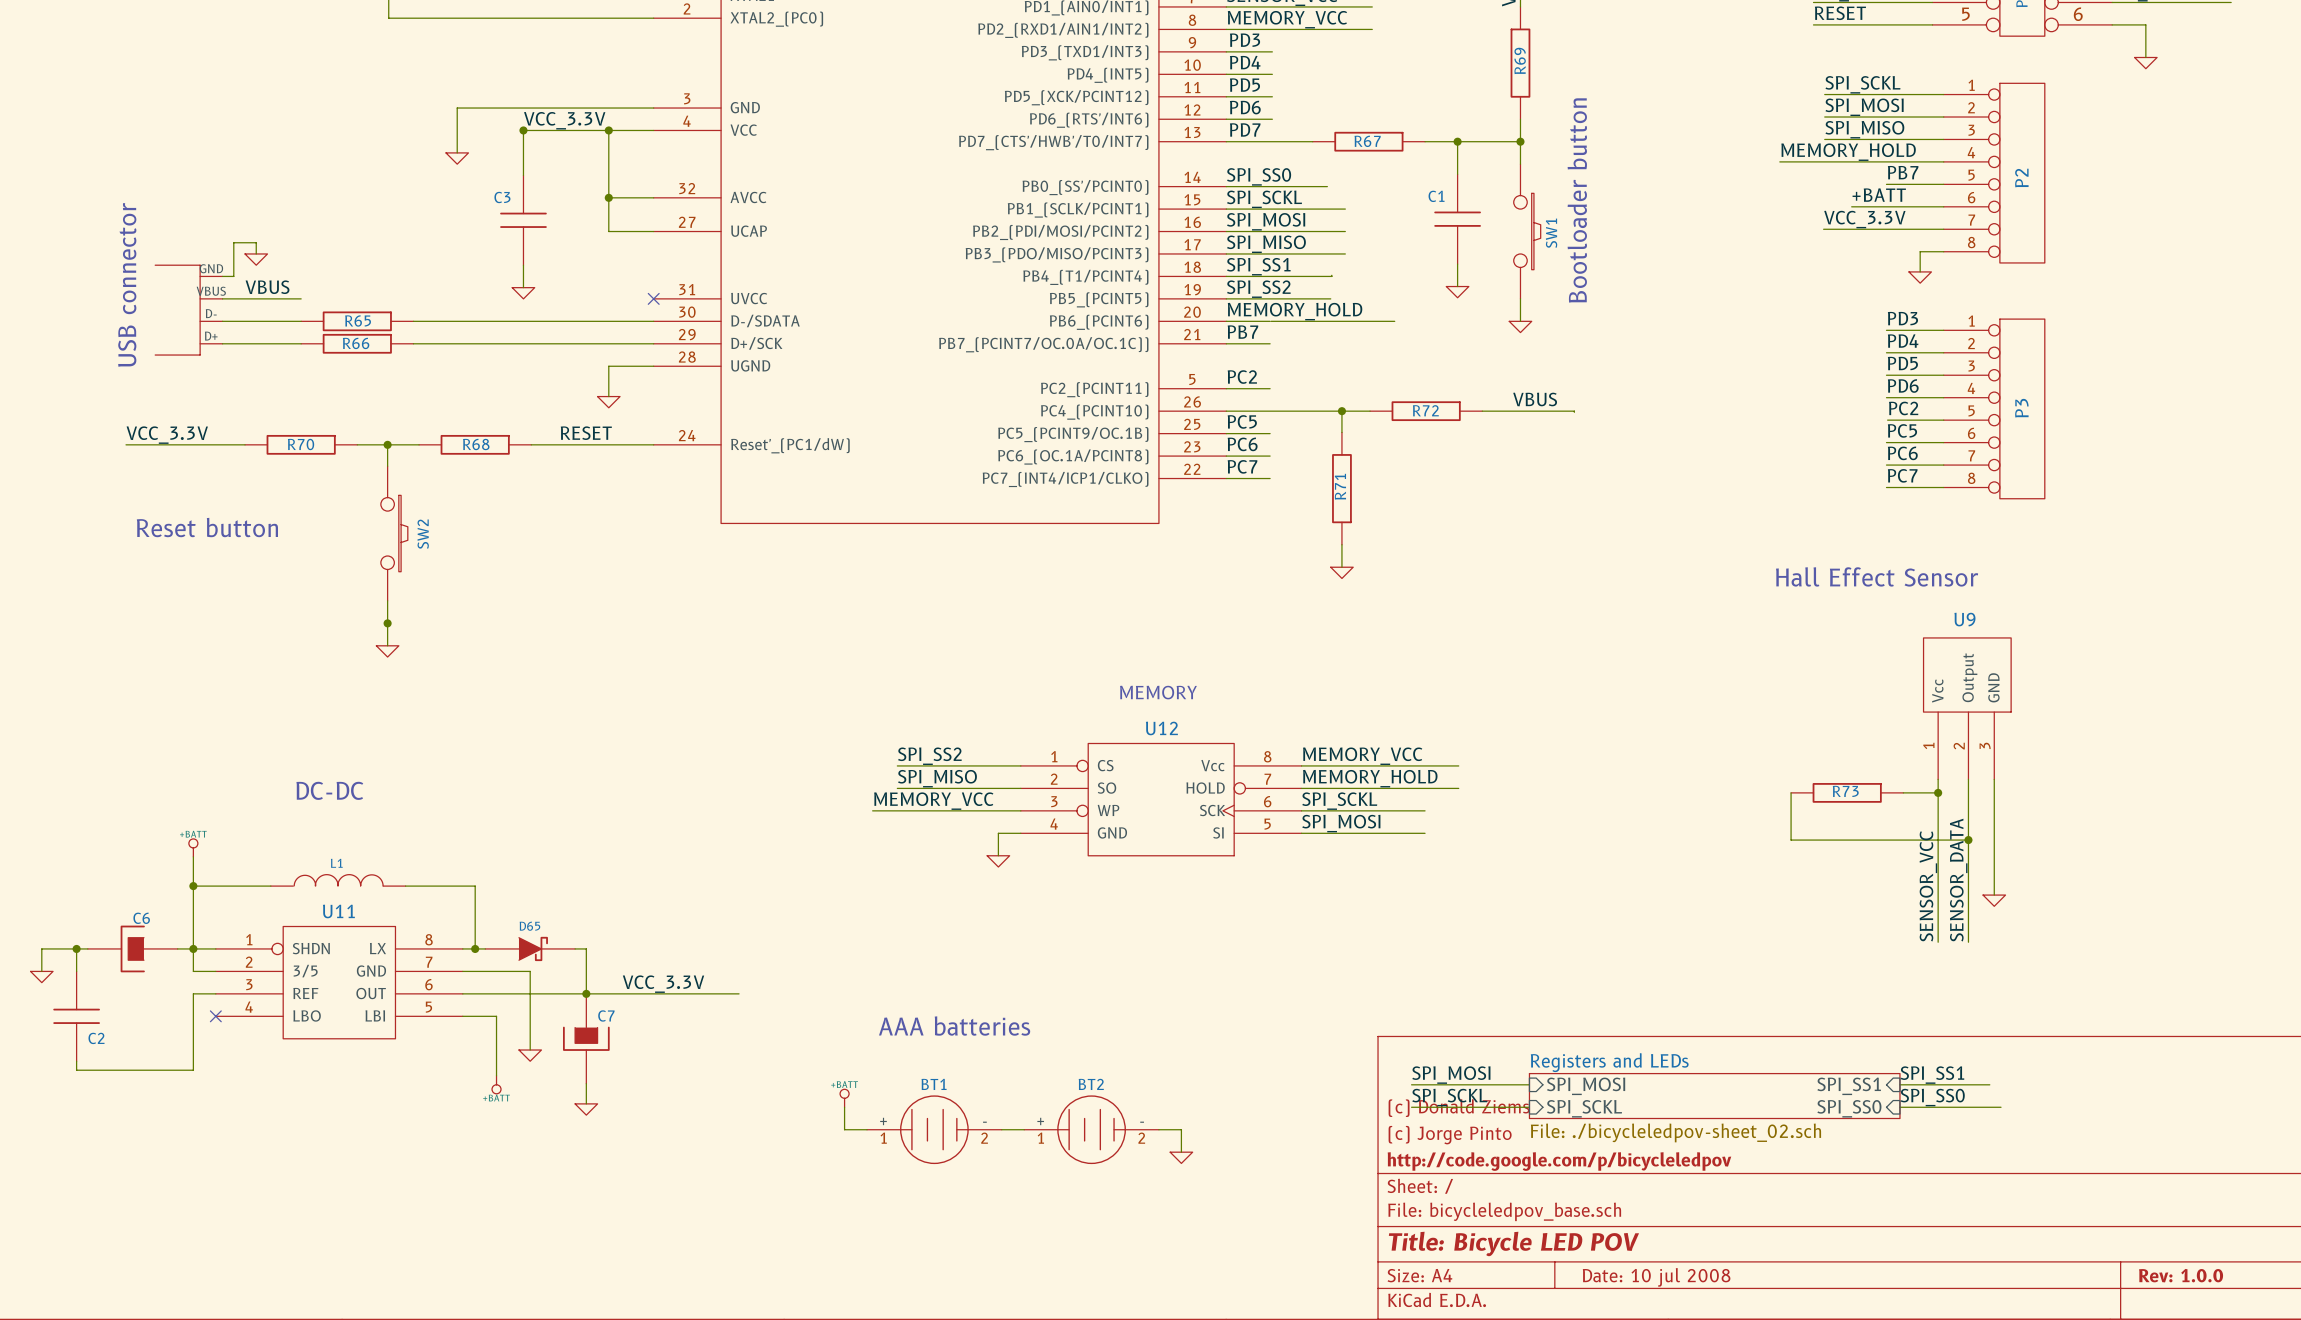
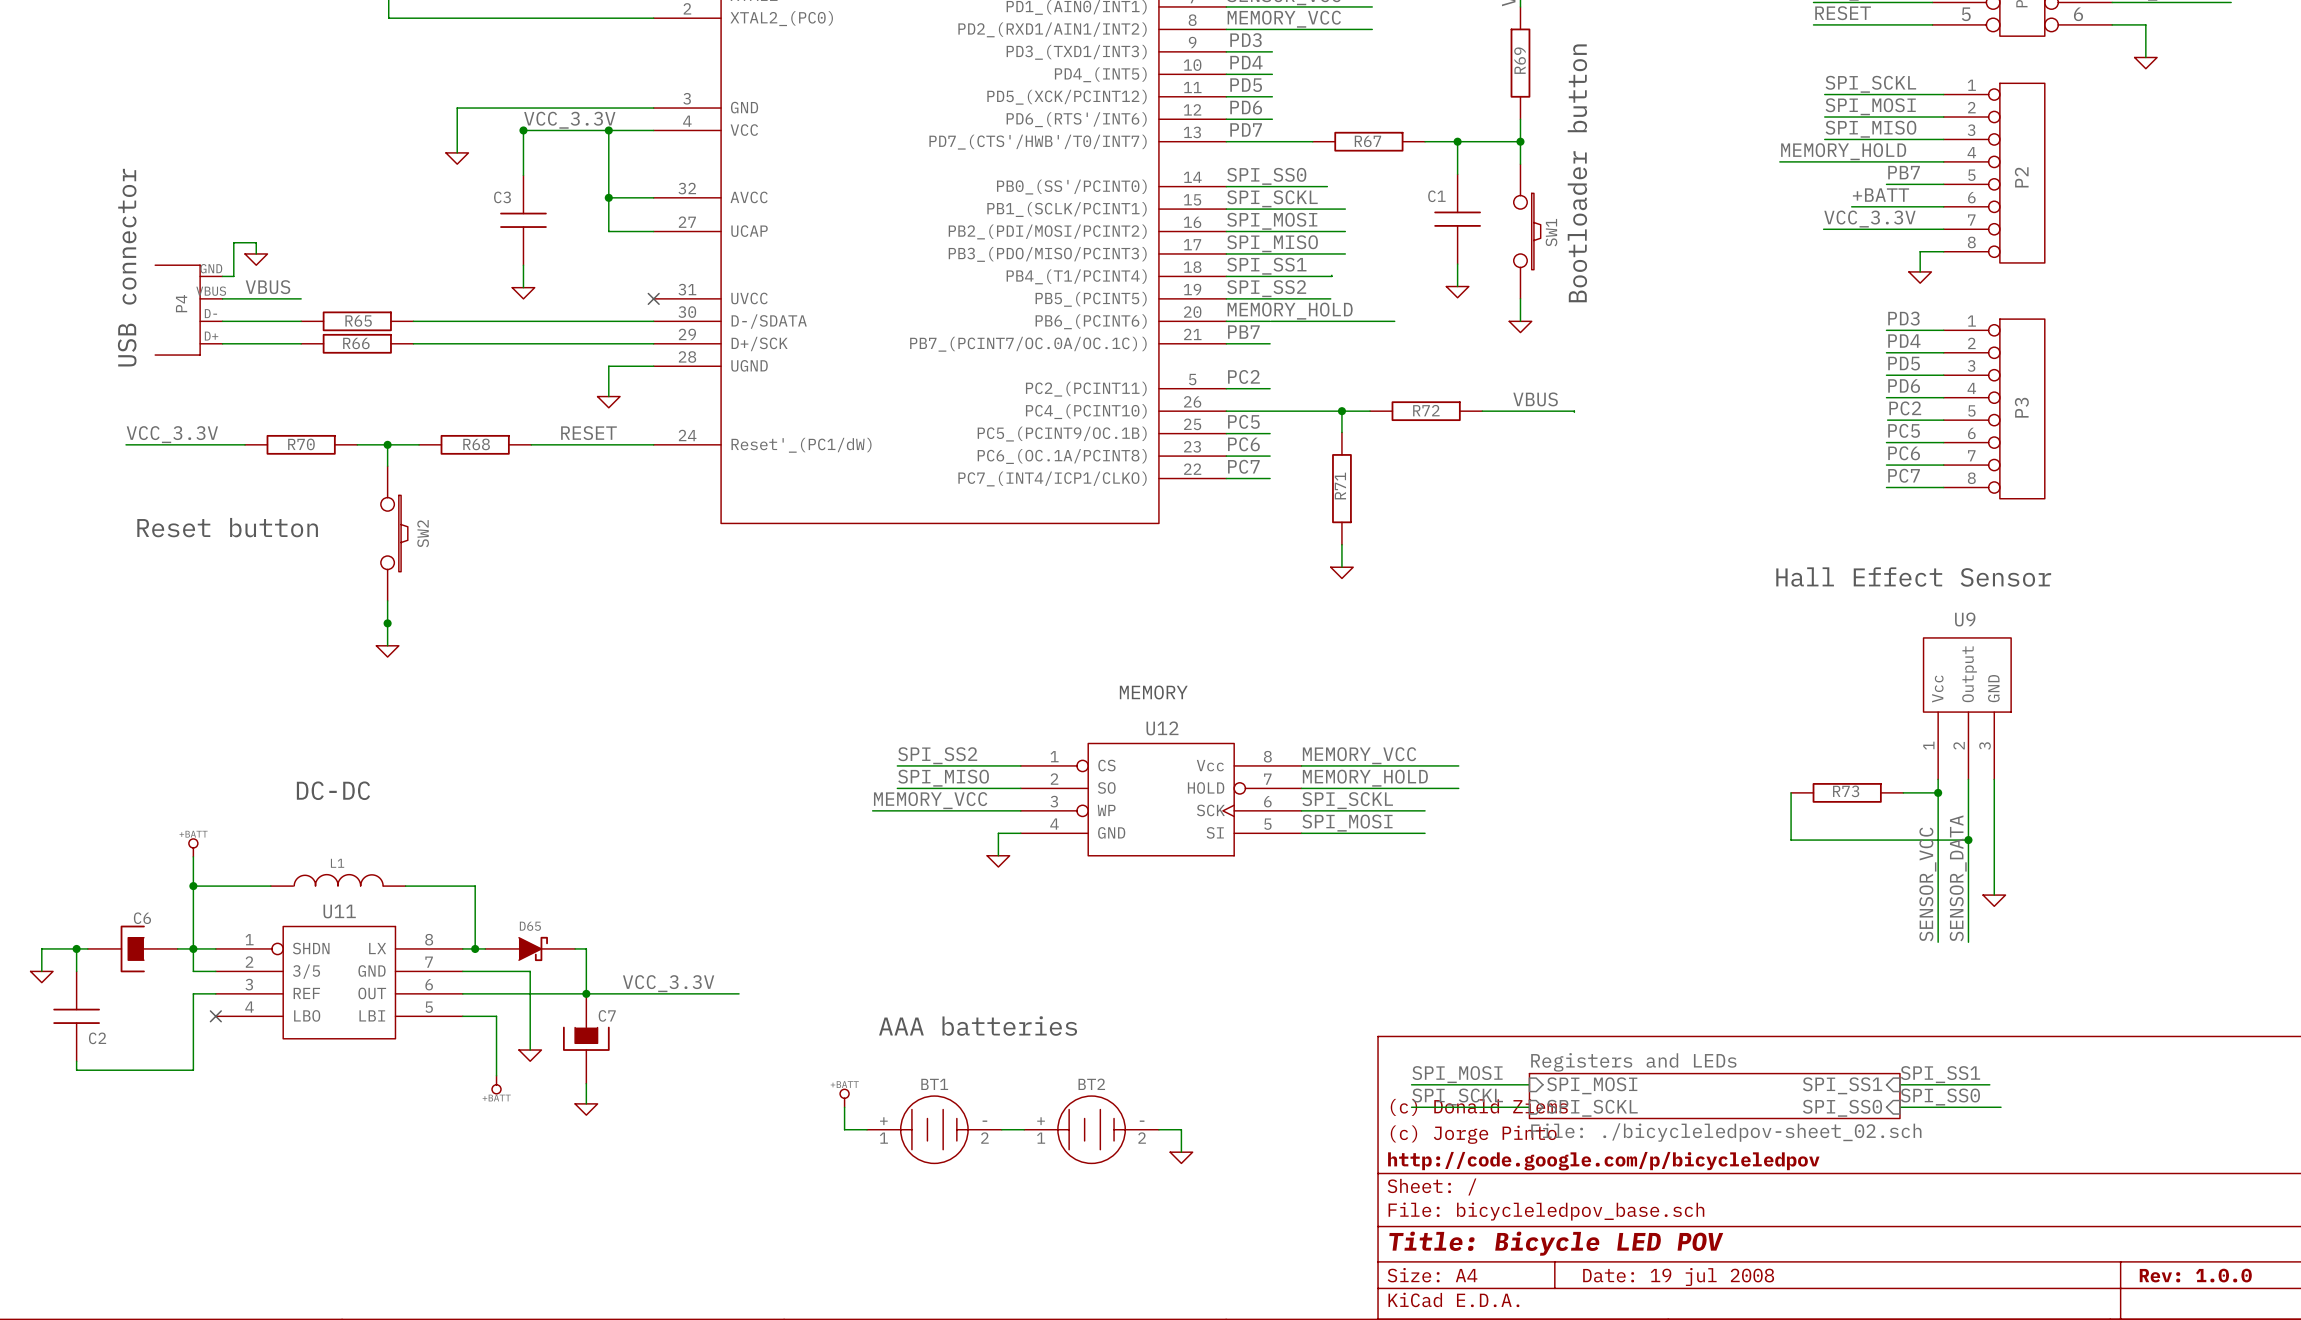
P4 name: none -> P4 (181, 303)
title block: Date: 10 jul 2008 (1656, 1277) -> Date: 19 jul 2008 (1678, 1276)

